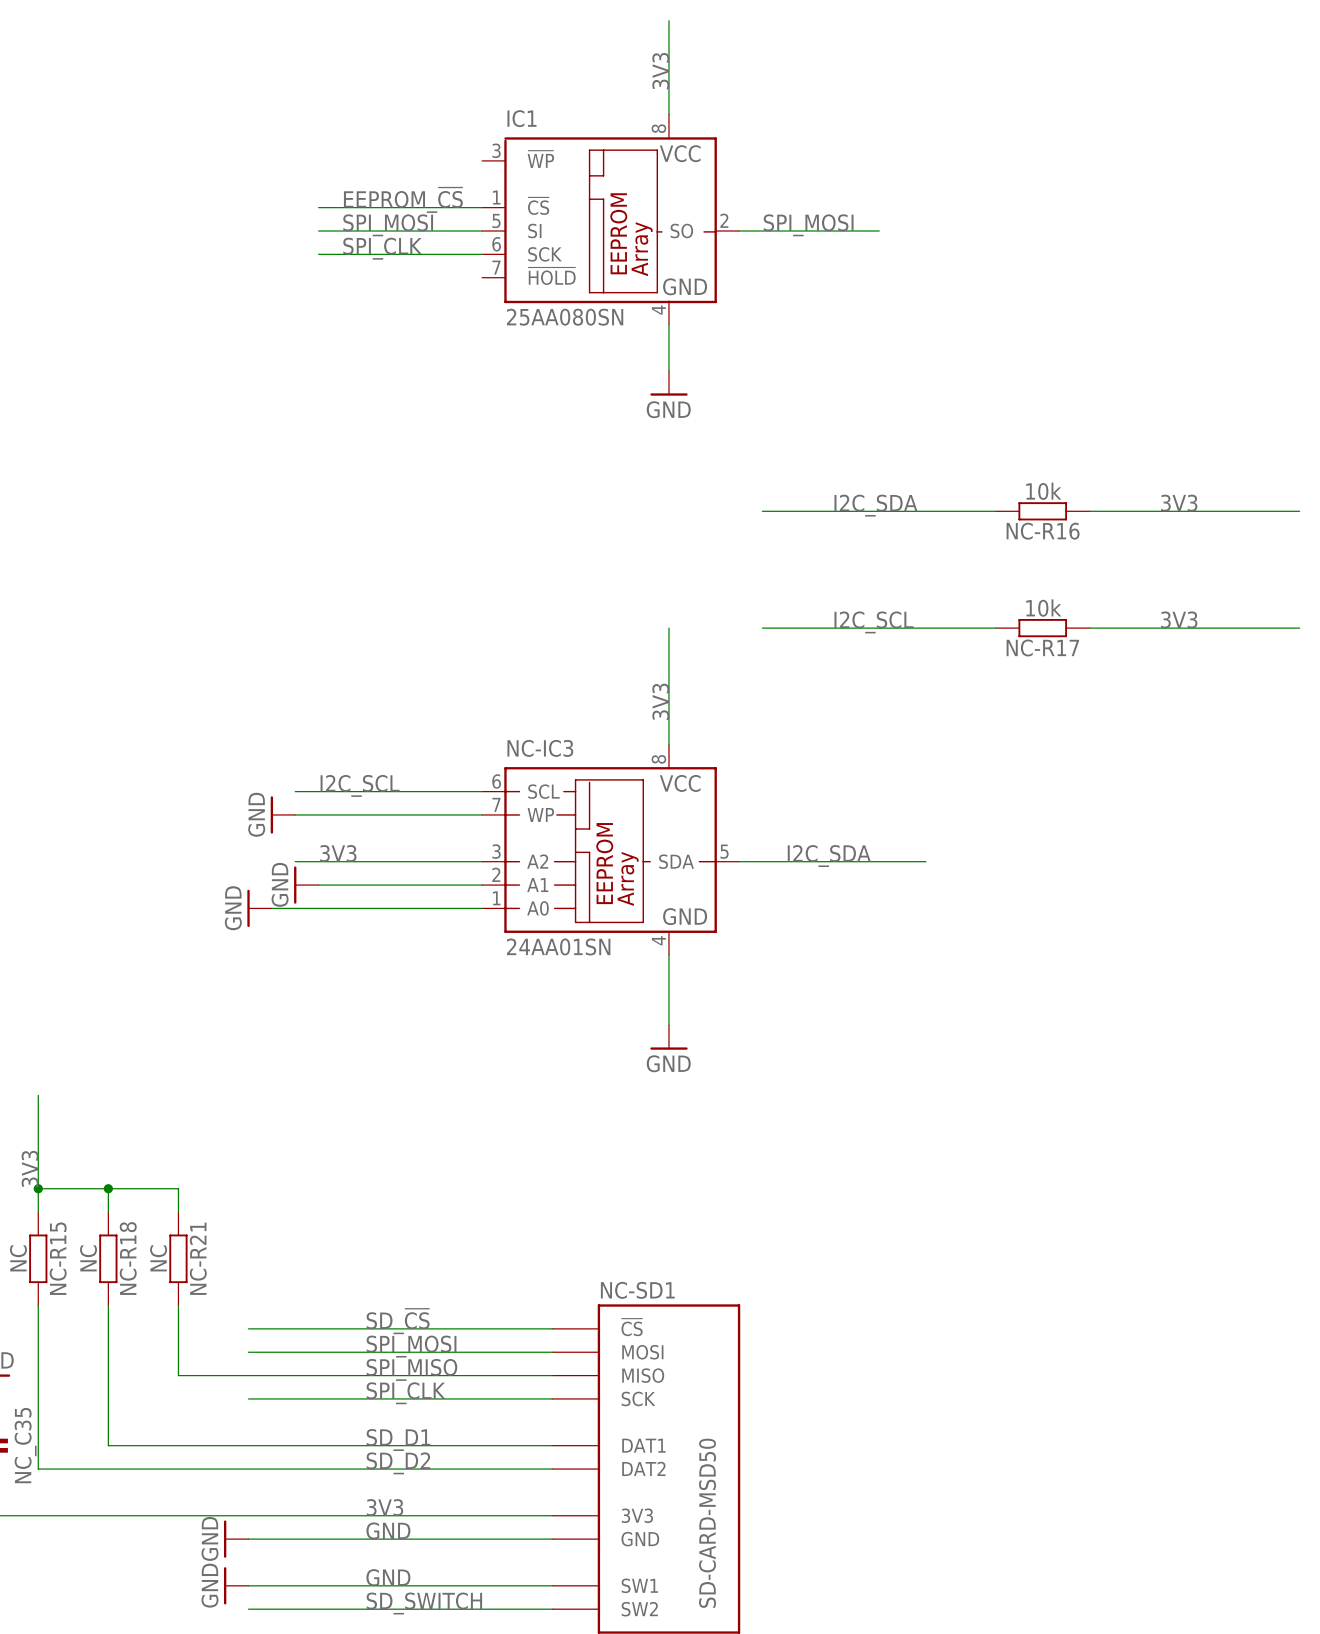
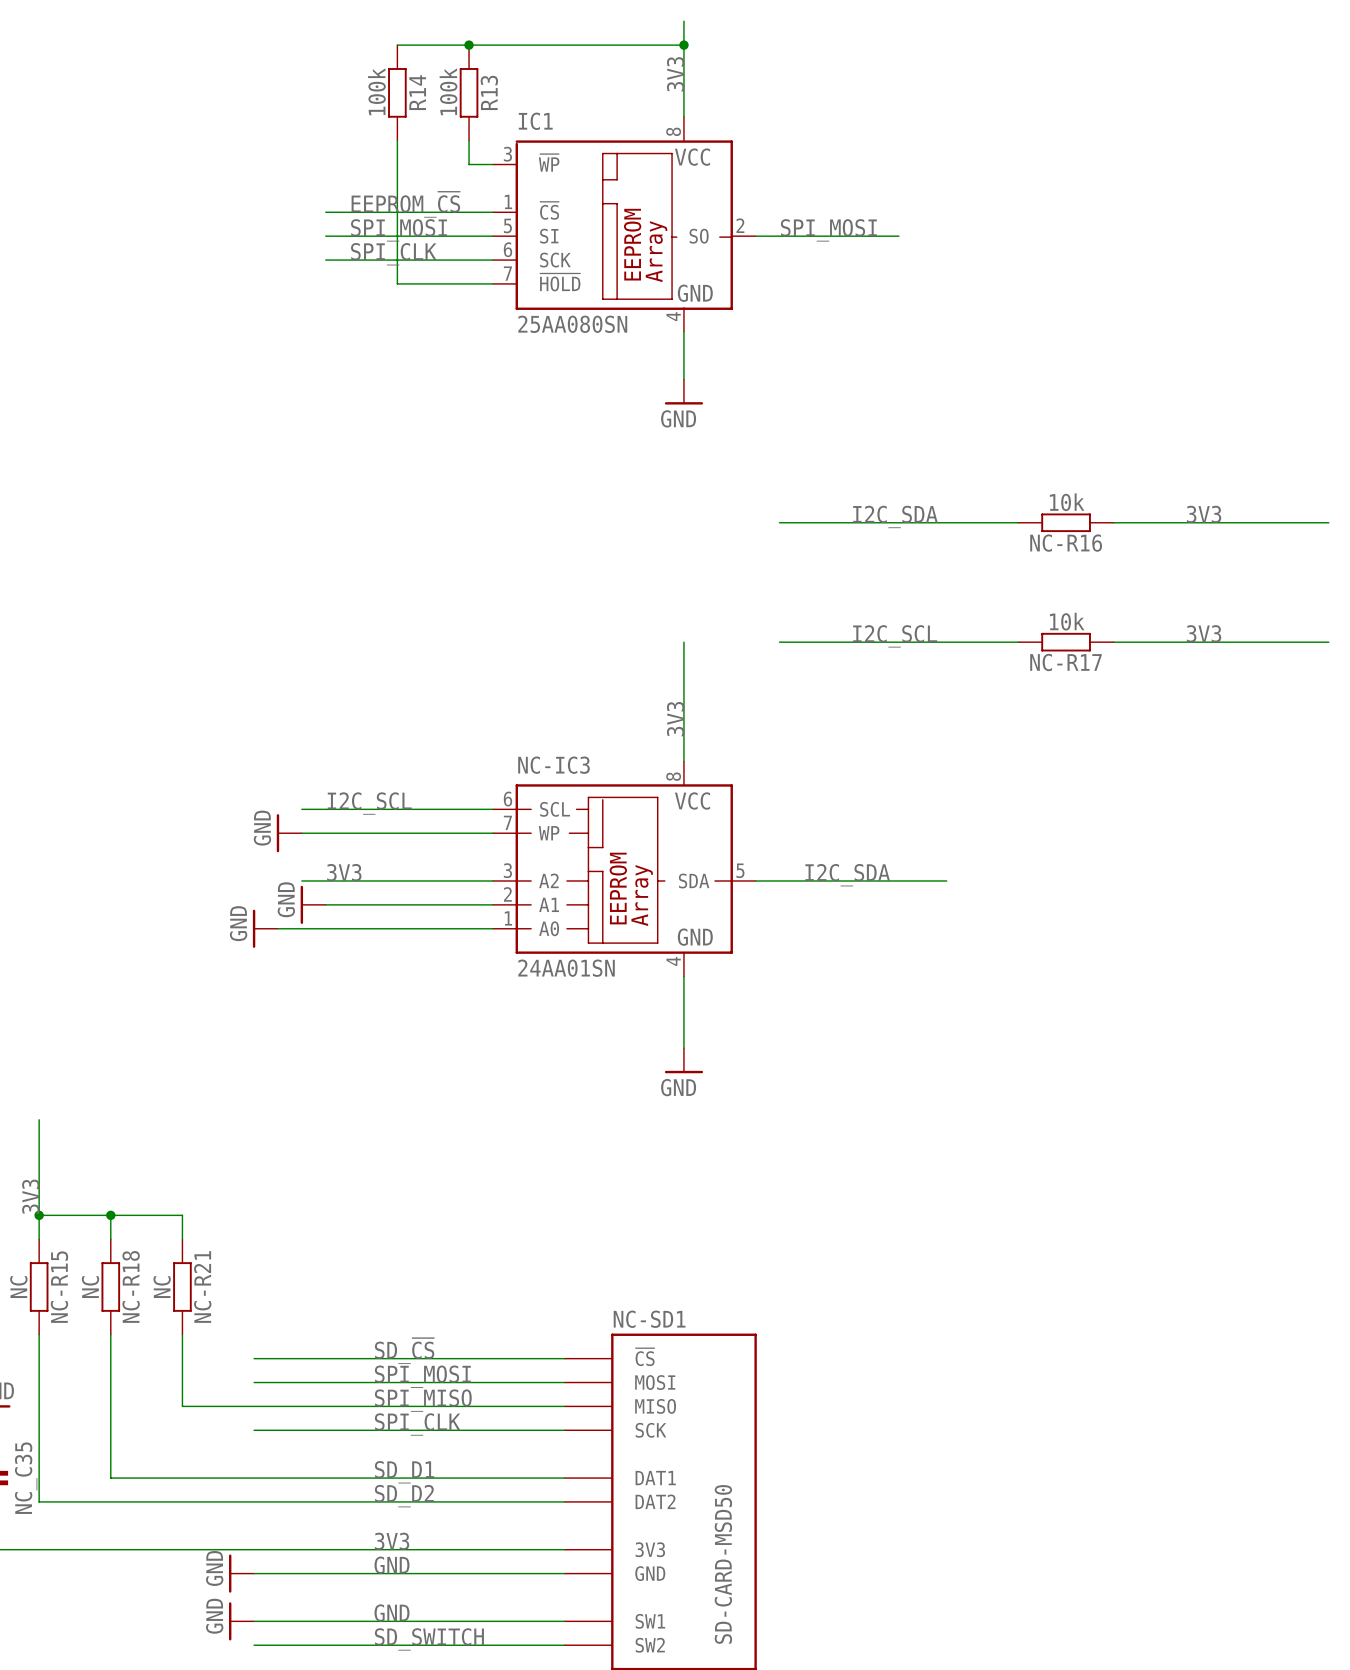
wire: none -> (397, 45) (683, 45)
junction: none -> (469, 45)
junction: none -> (683, 45)
R14: none -> 100k (397, 92)
R13: none -> 100k (469, 92)
wire: none -> (397, 140) (397, 283) (492, 283)
wire: none -> (469, 140) (469, 164) (492, 164)

